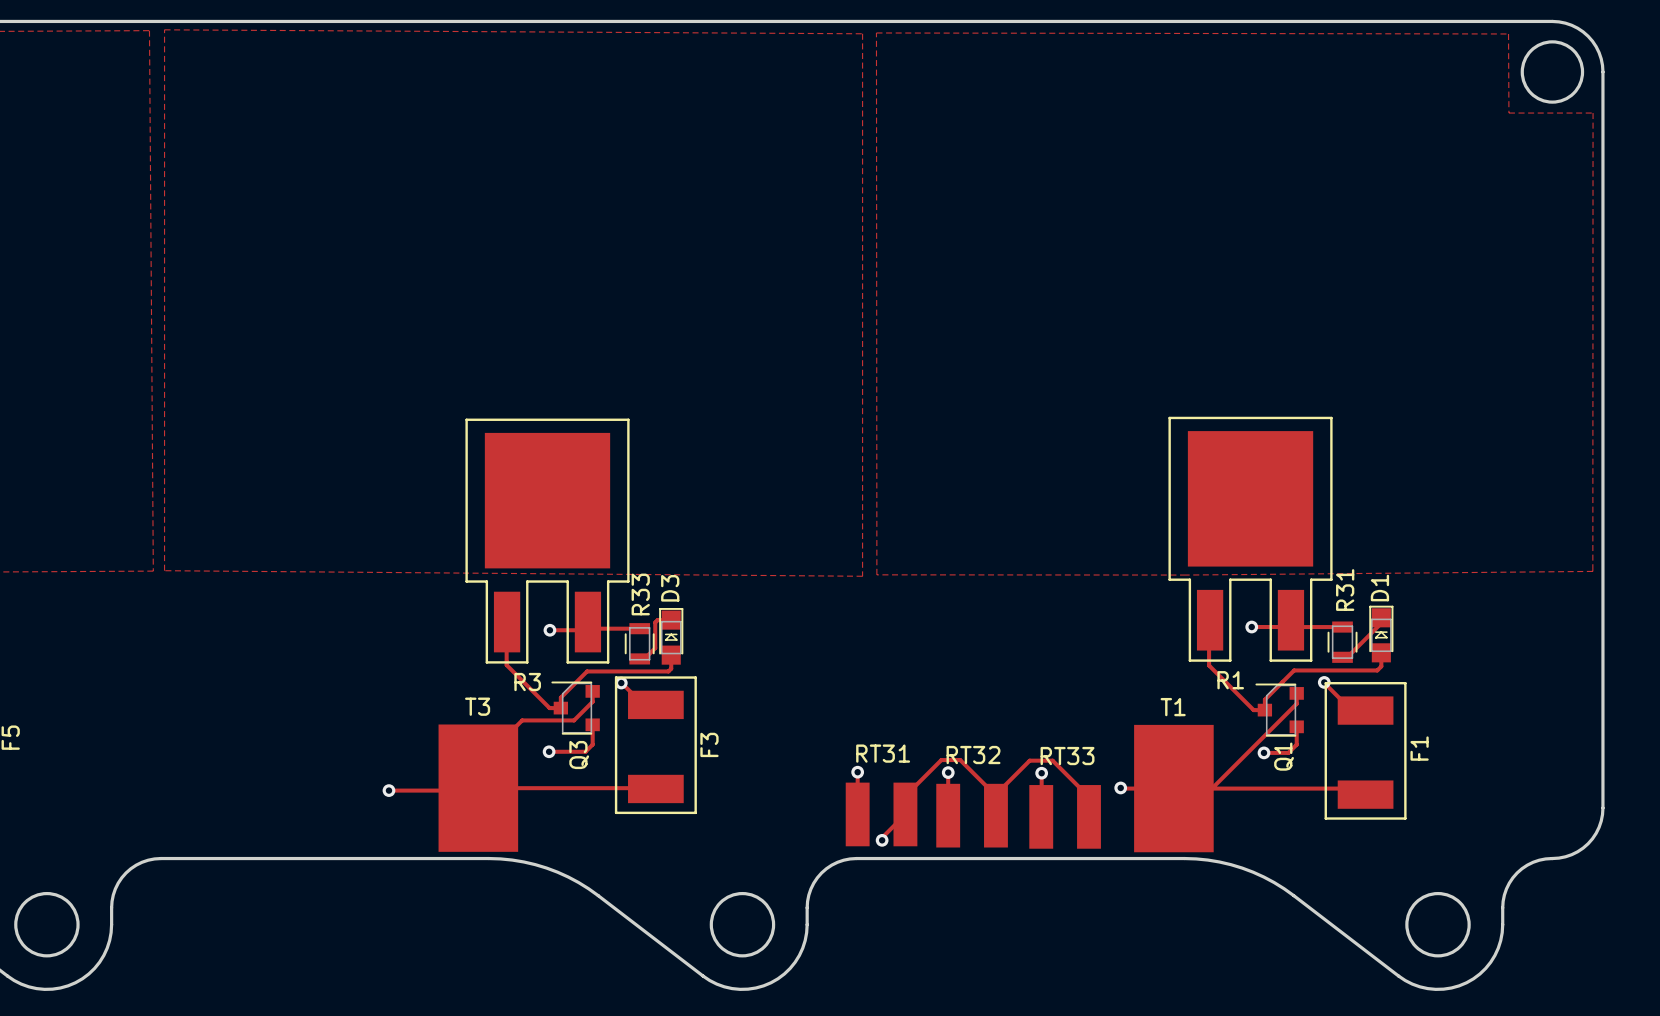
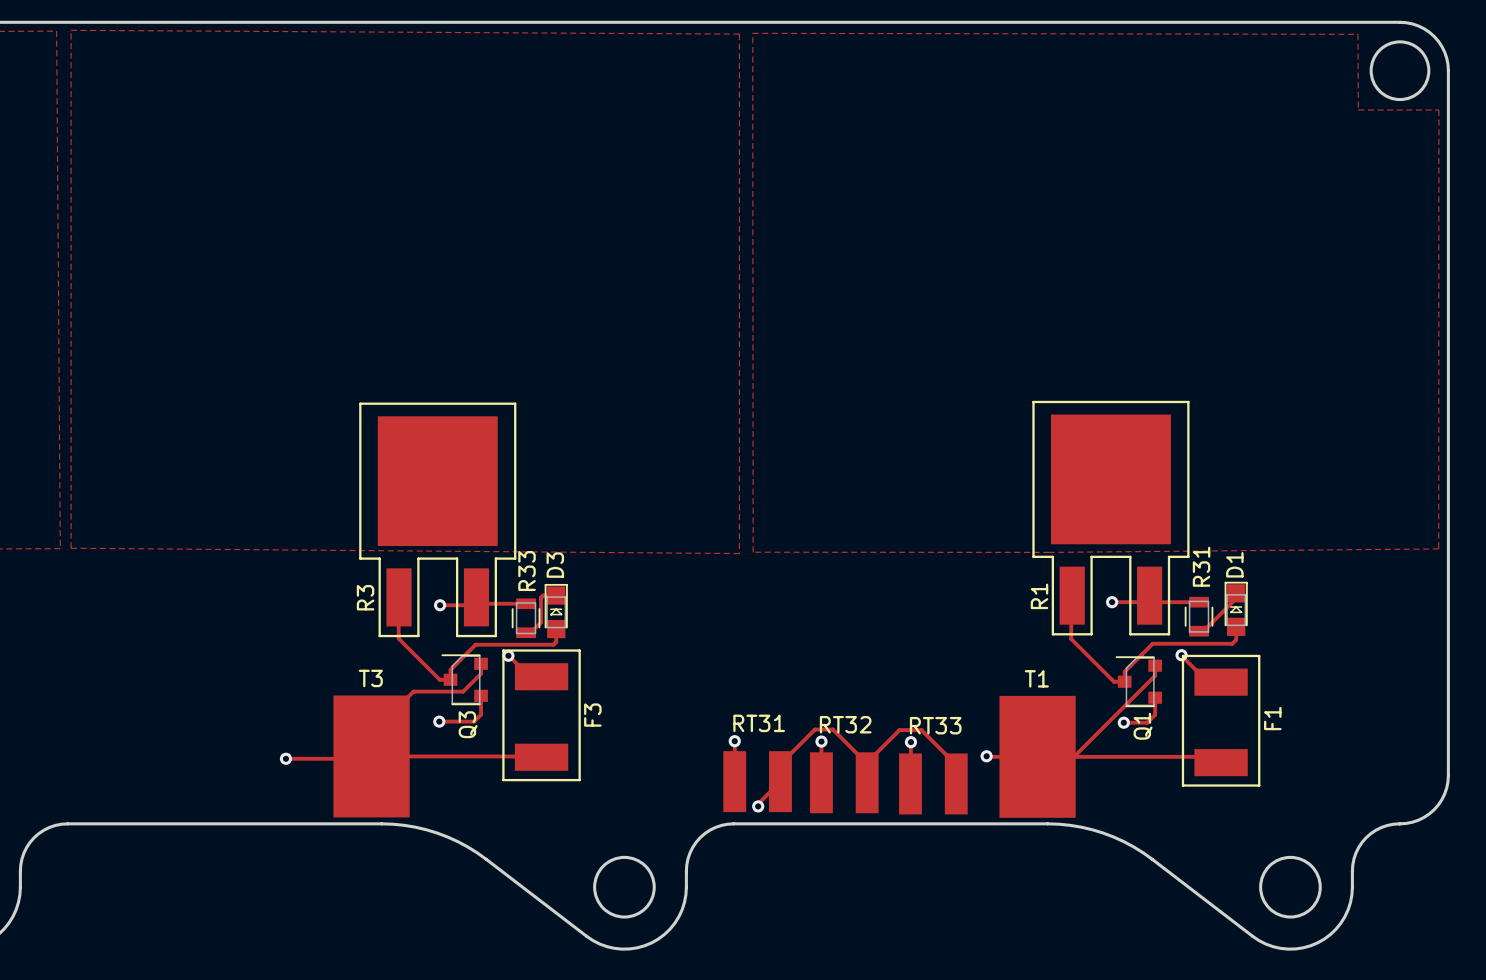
R1 name rotation: 0° (1230, 680) -> 90° counterclockwise (1039, 596)
R1 name position: R1 (1230, 680) -> R1 (1039, 596)
R3 name rotation: 0° (527, 682) -> 90° counterclockwise (365, 597)
R3 name position: R3 (527, 682) -> R3 (365, 597)

